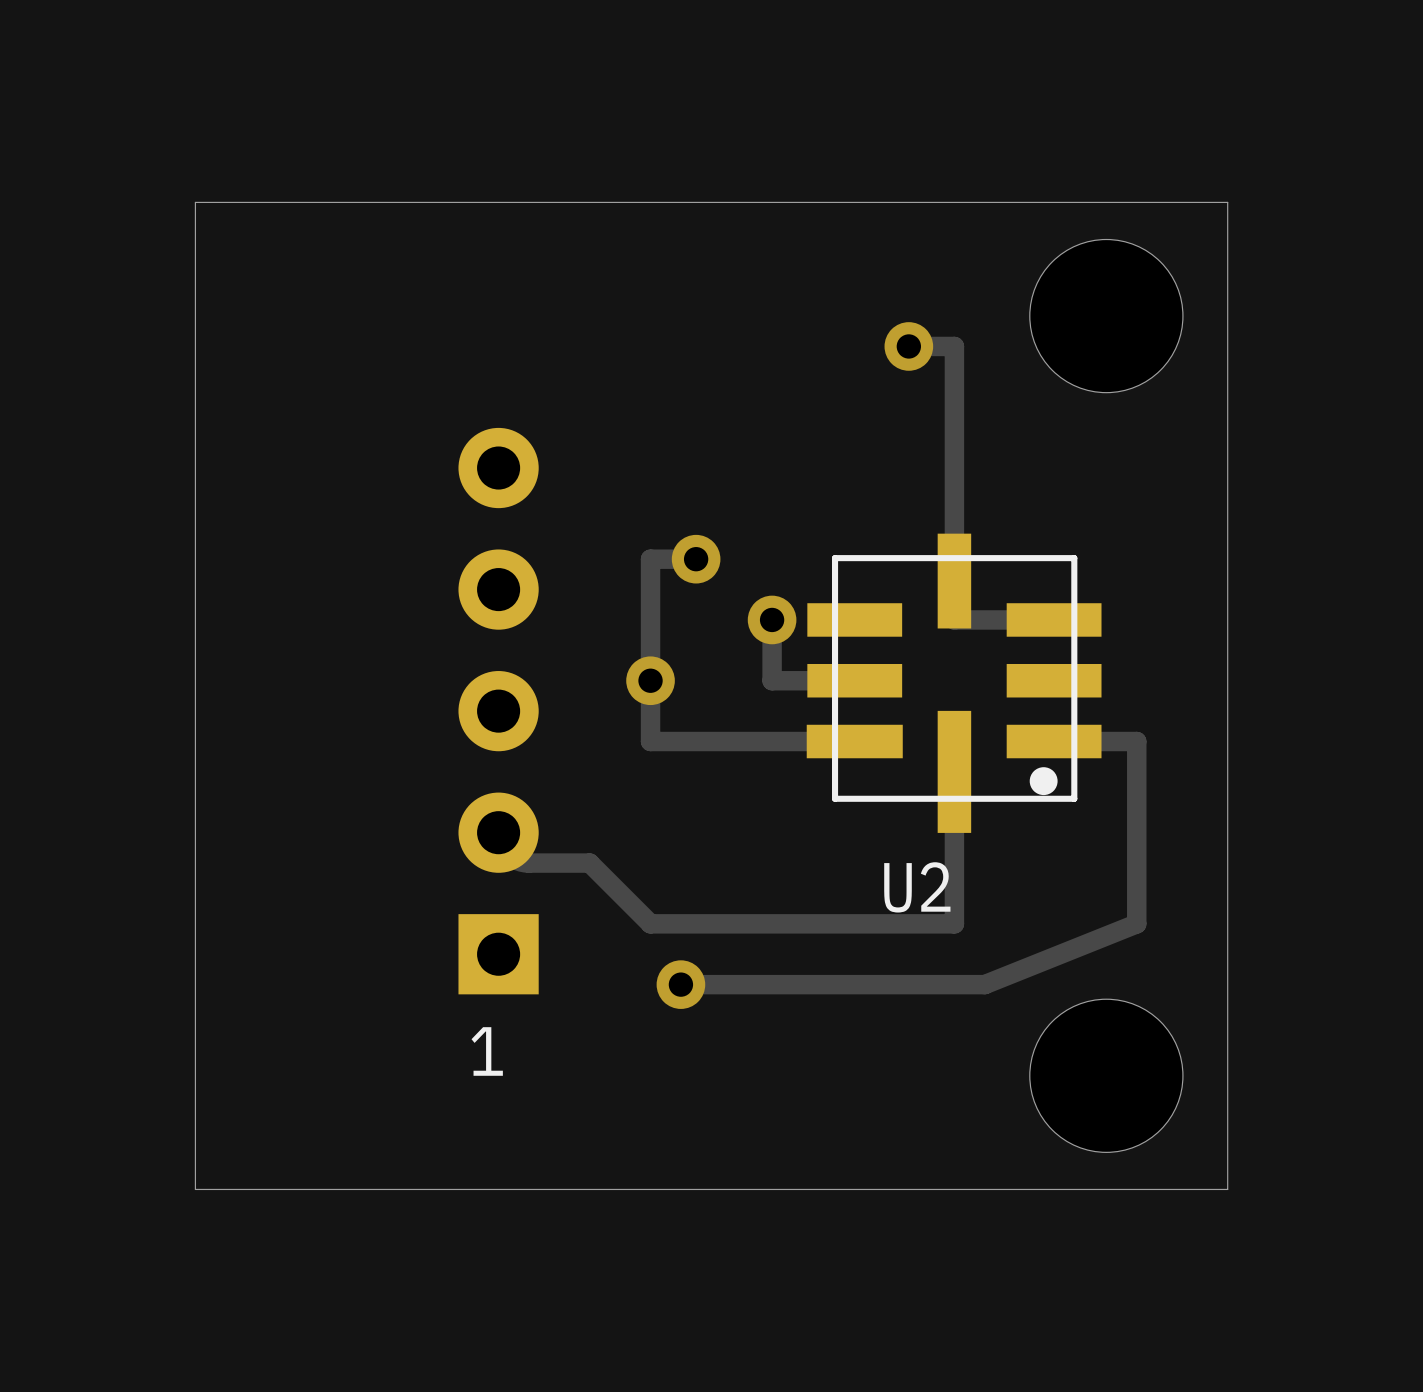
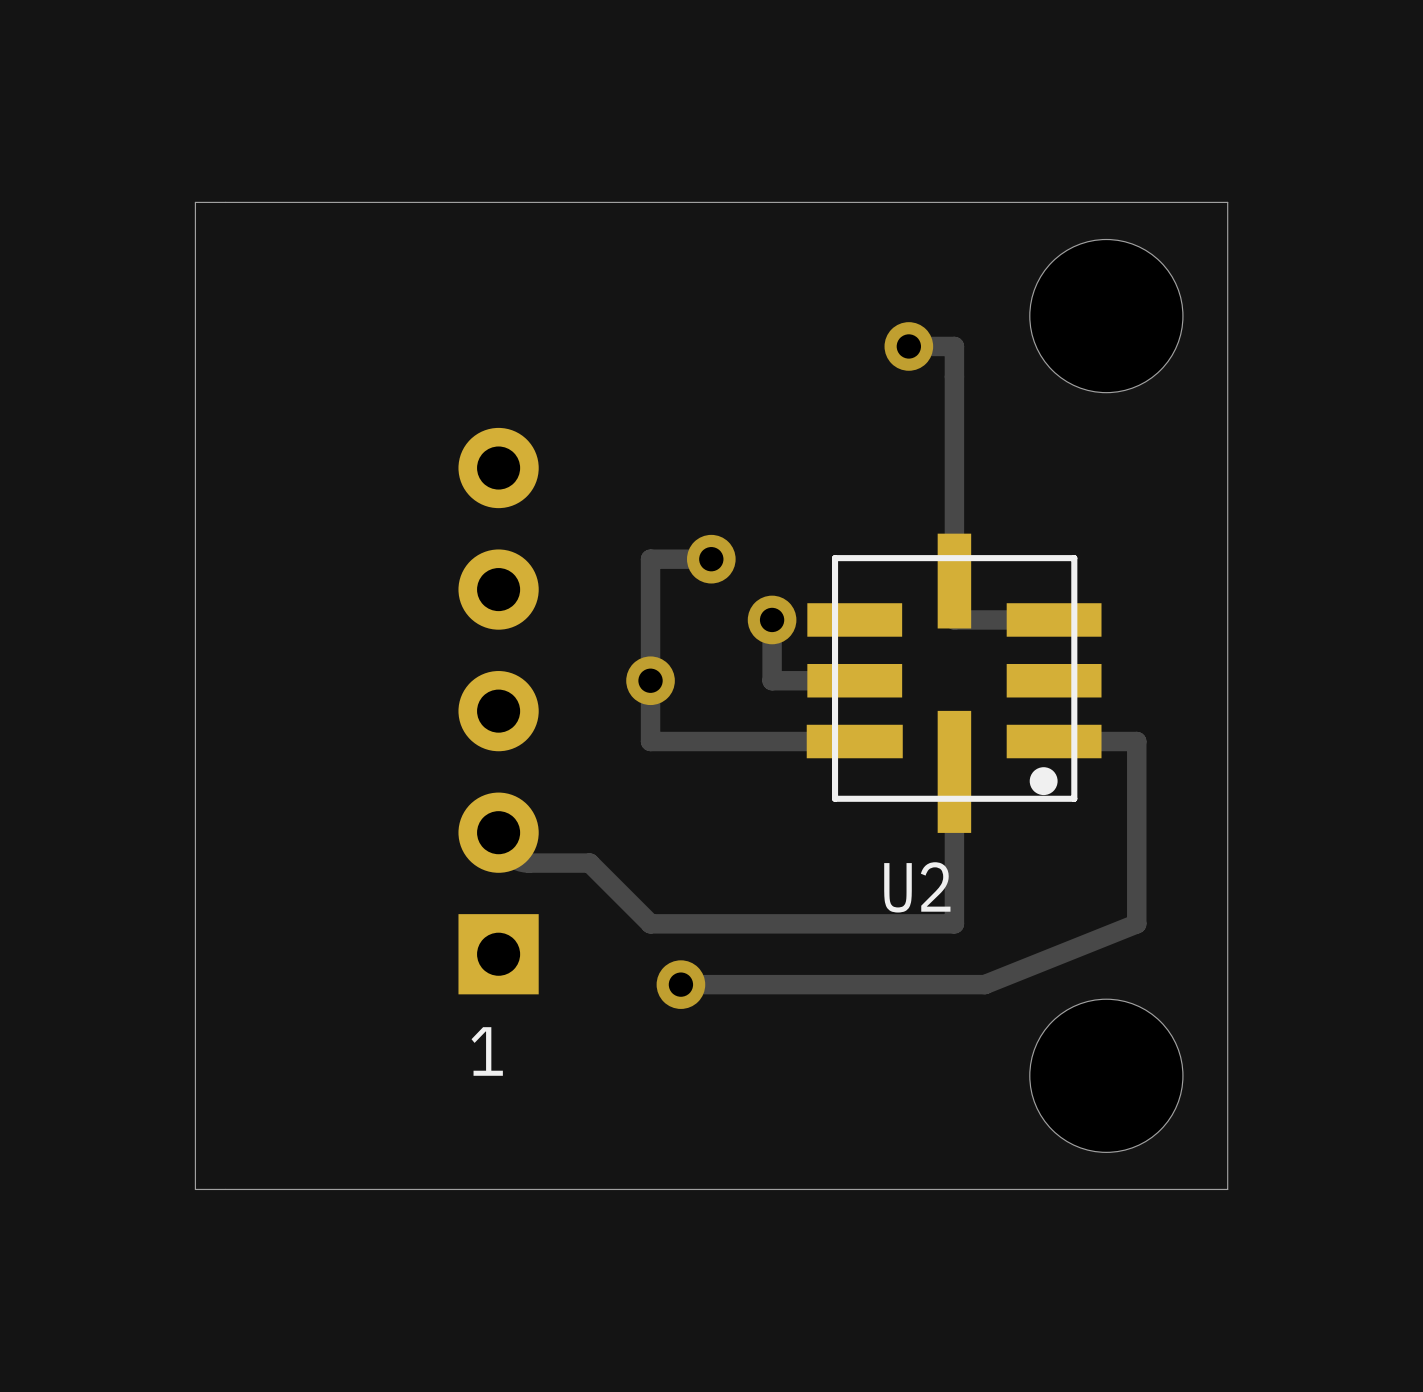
via position: (696, 559) -> (711, 559)

